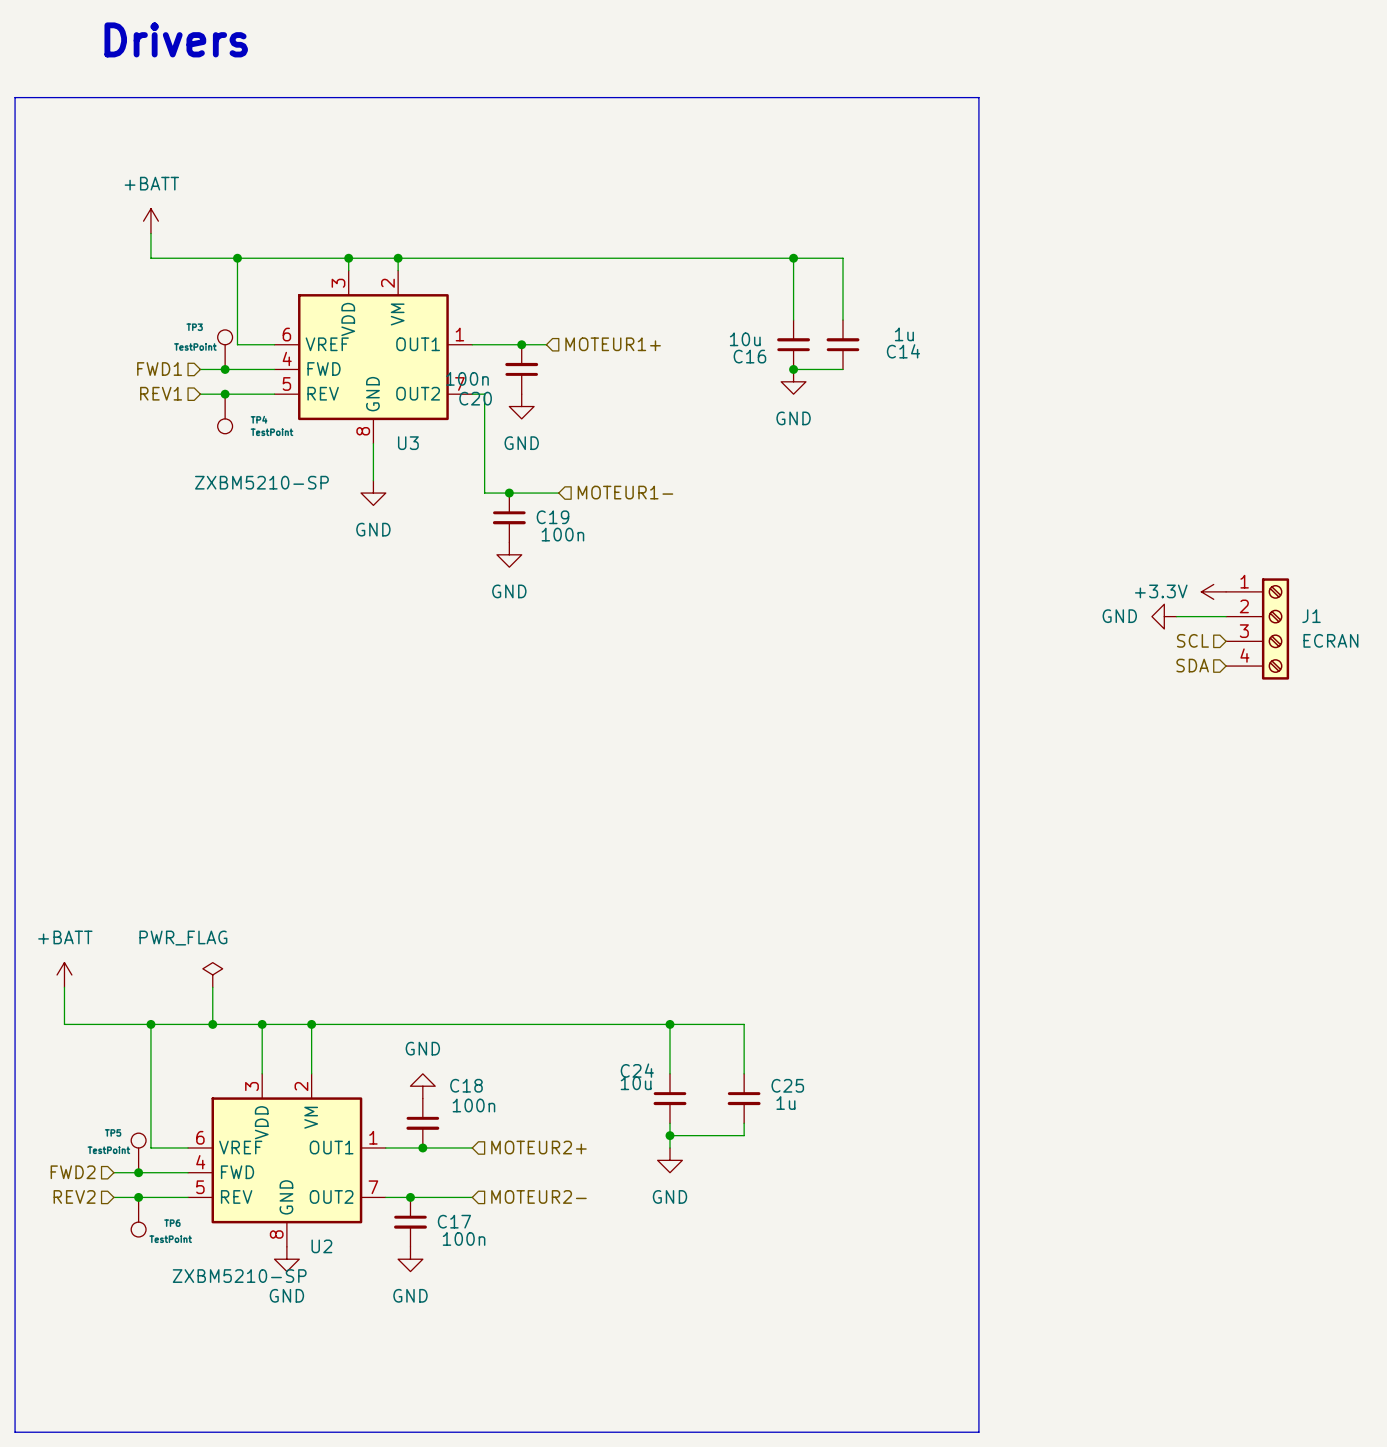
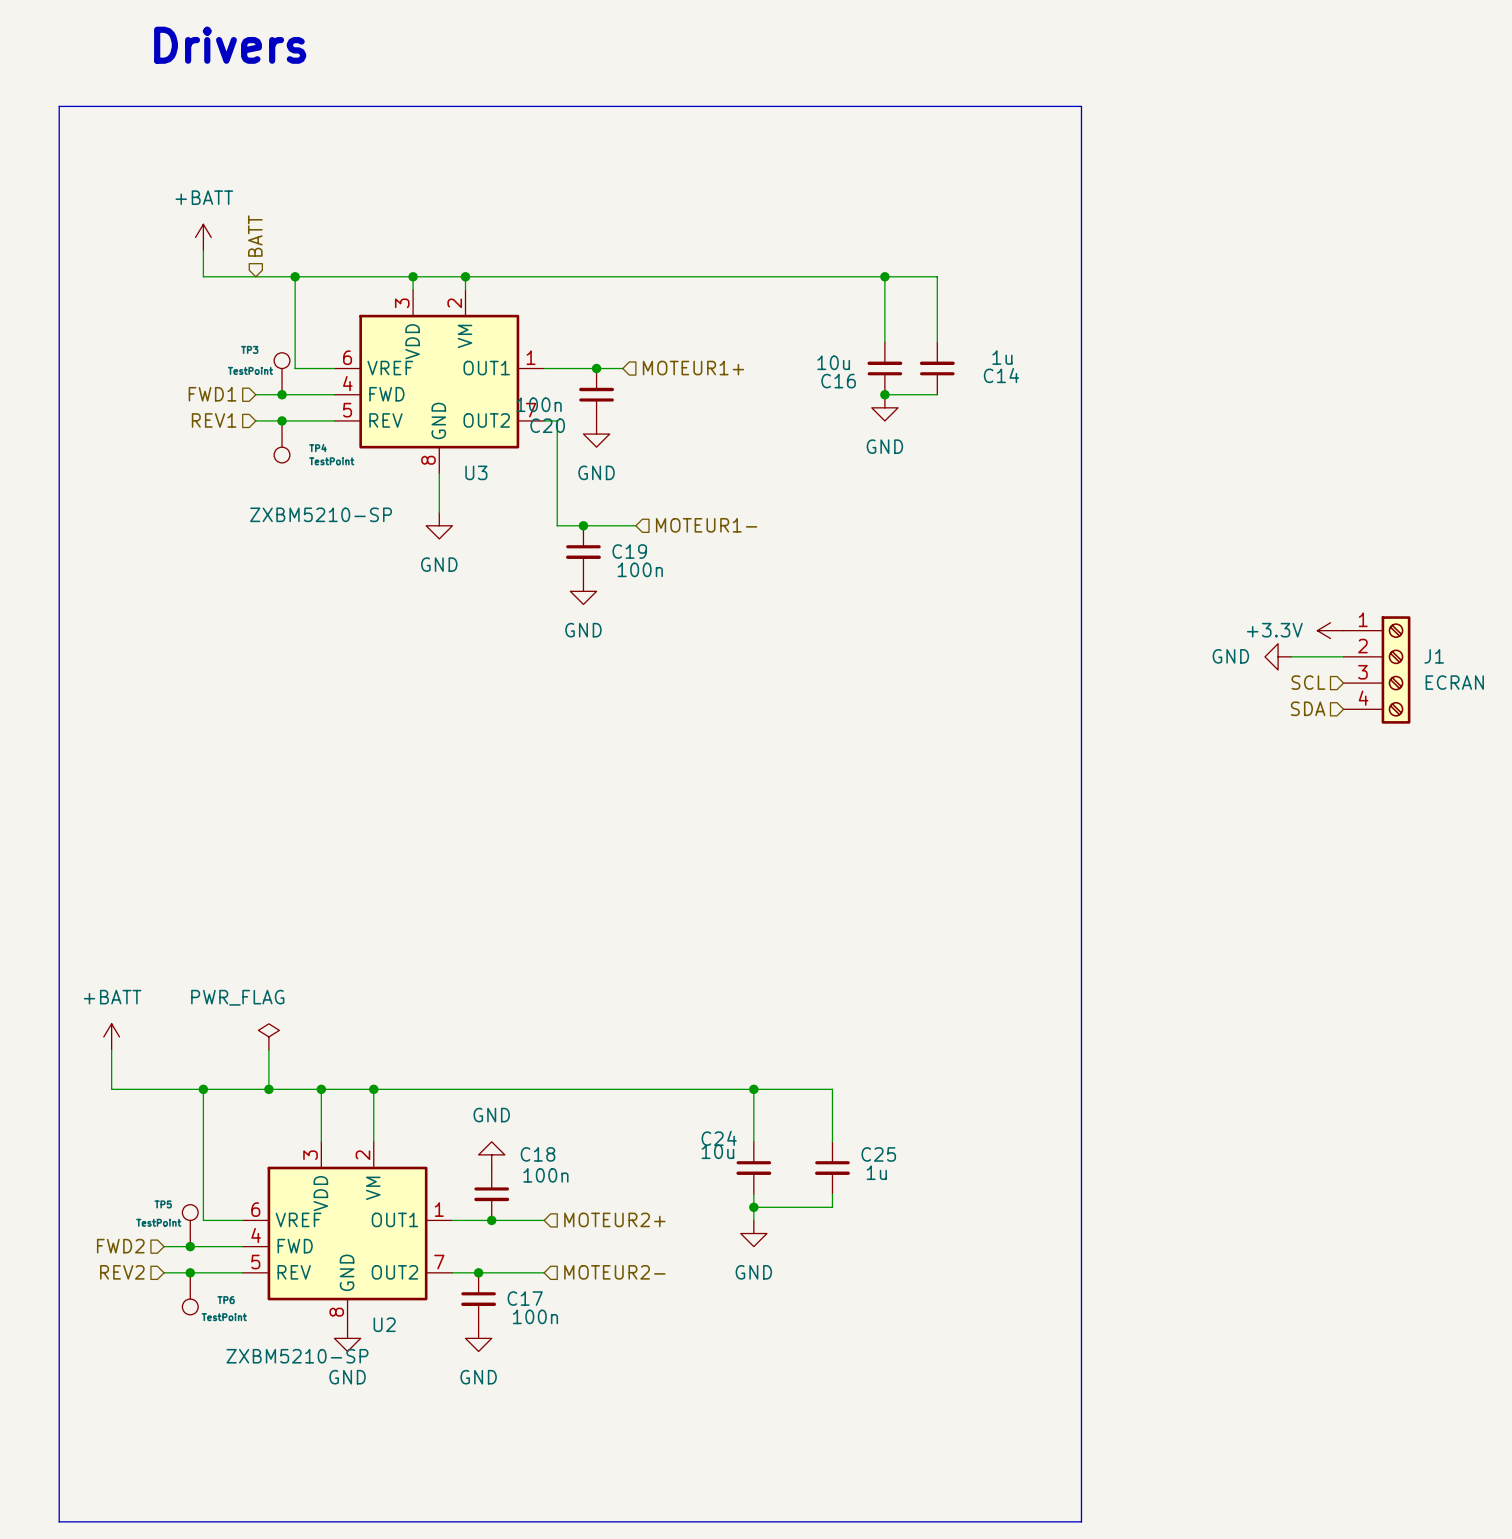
hierarchical label: none -> BATT (255, 236)

